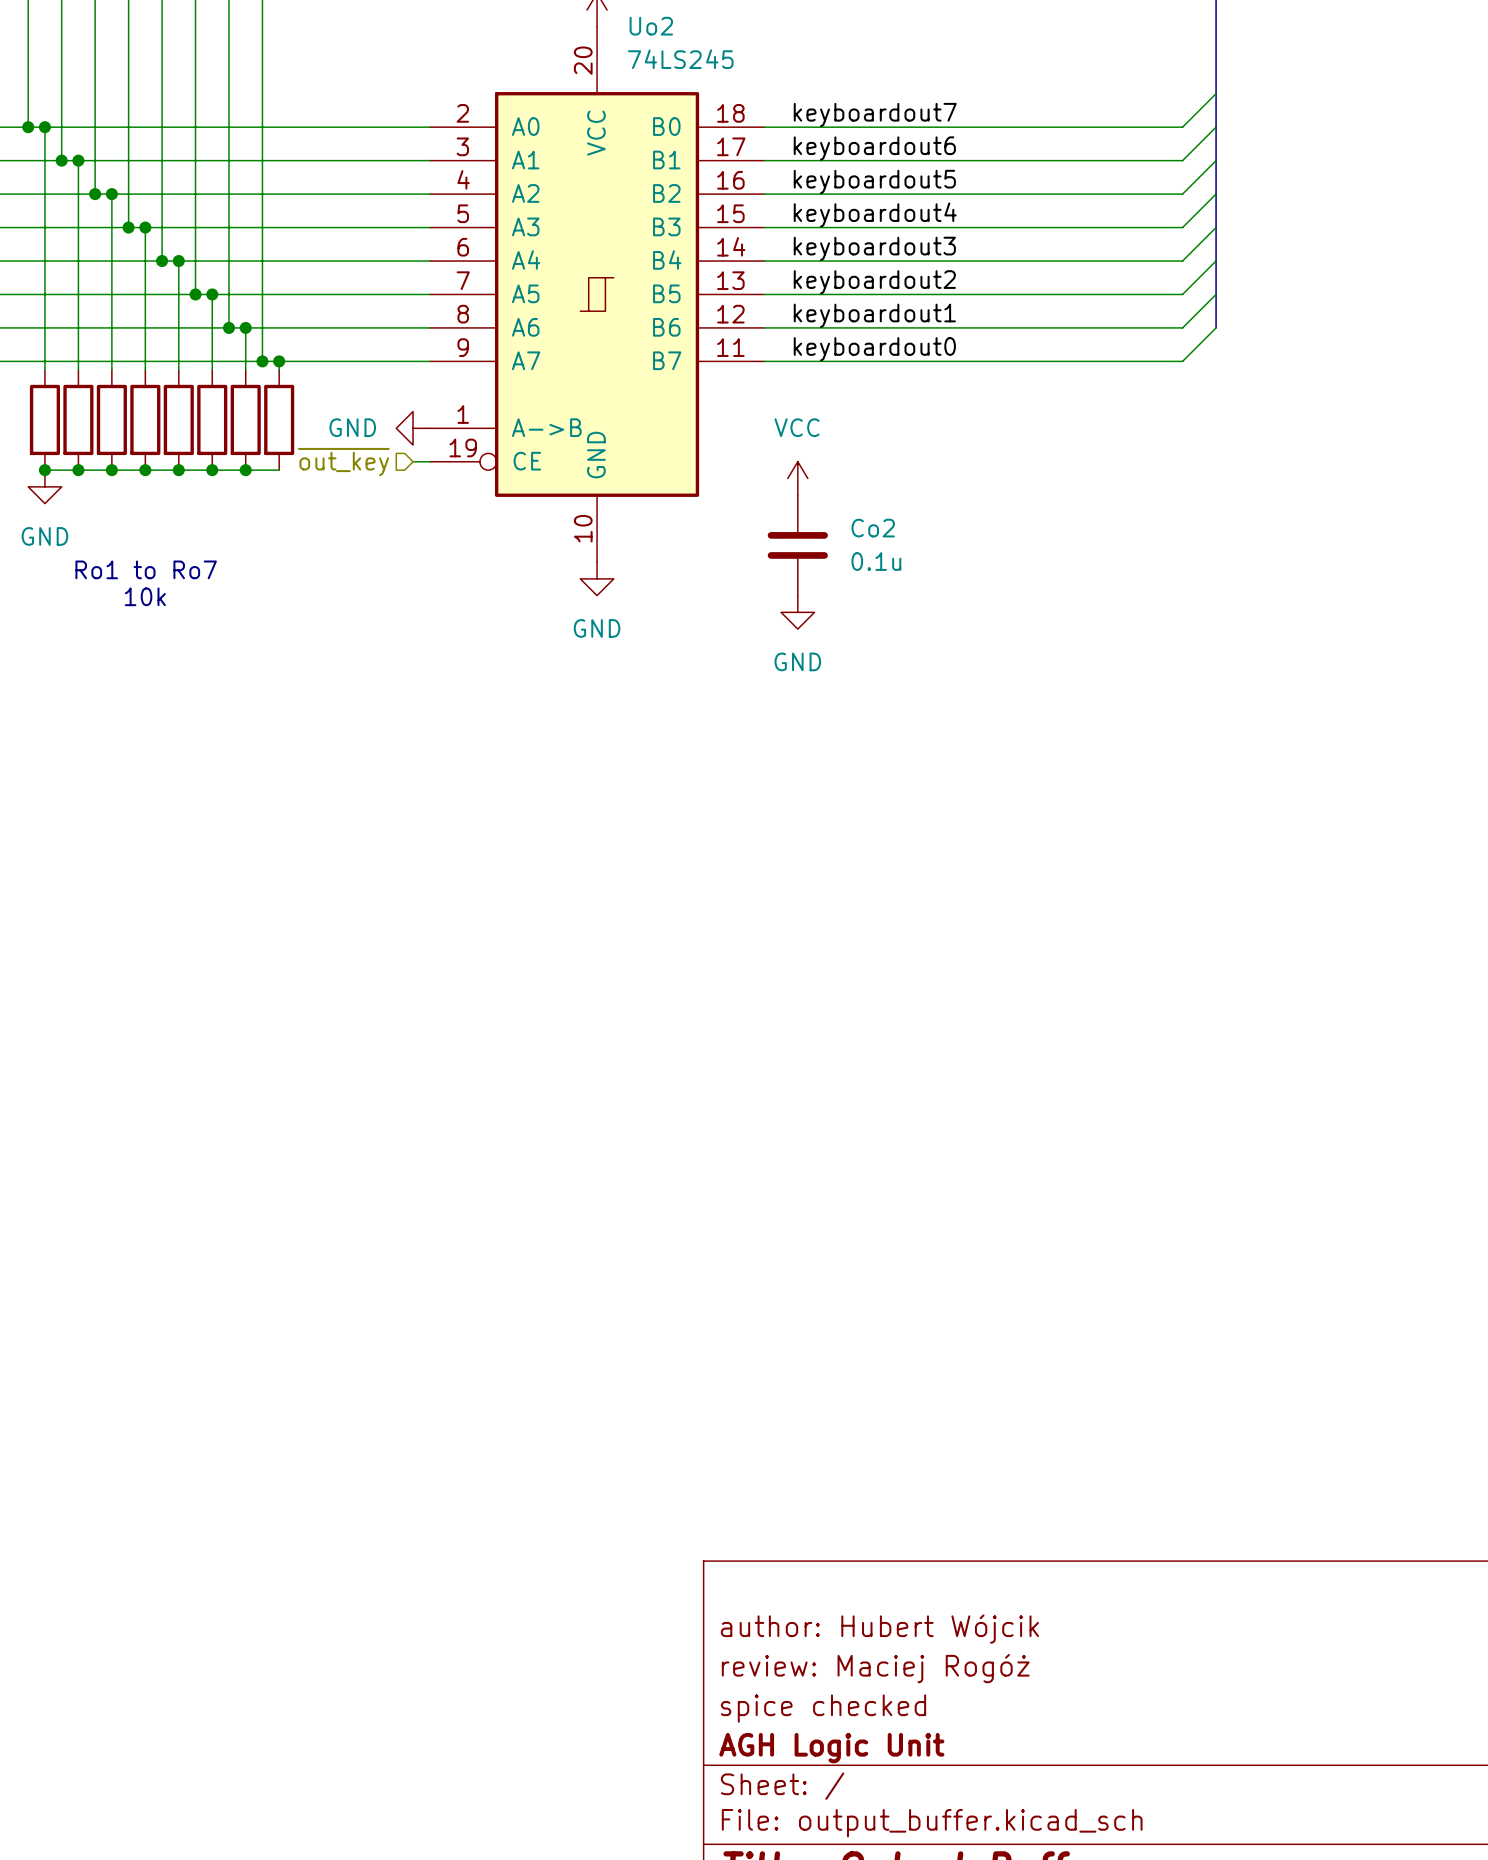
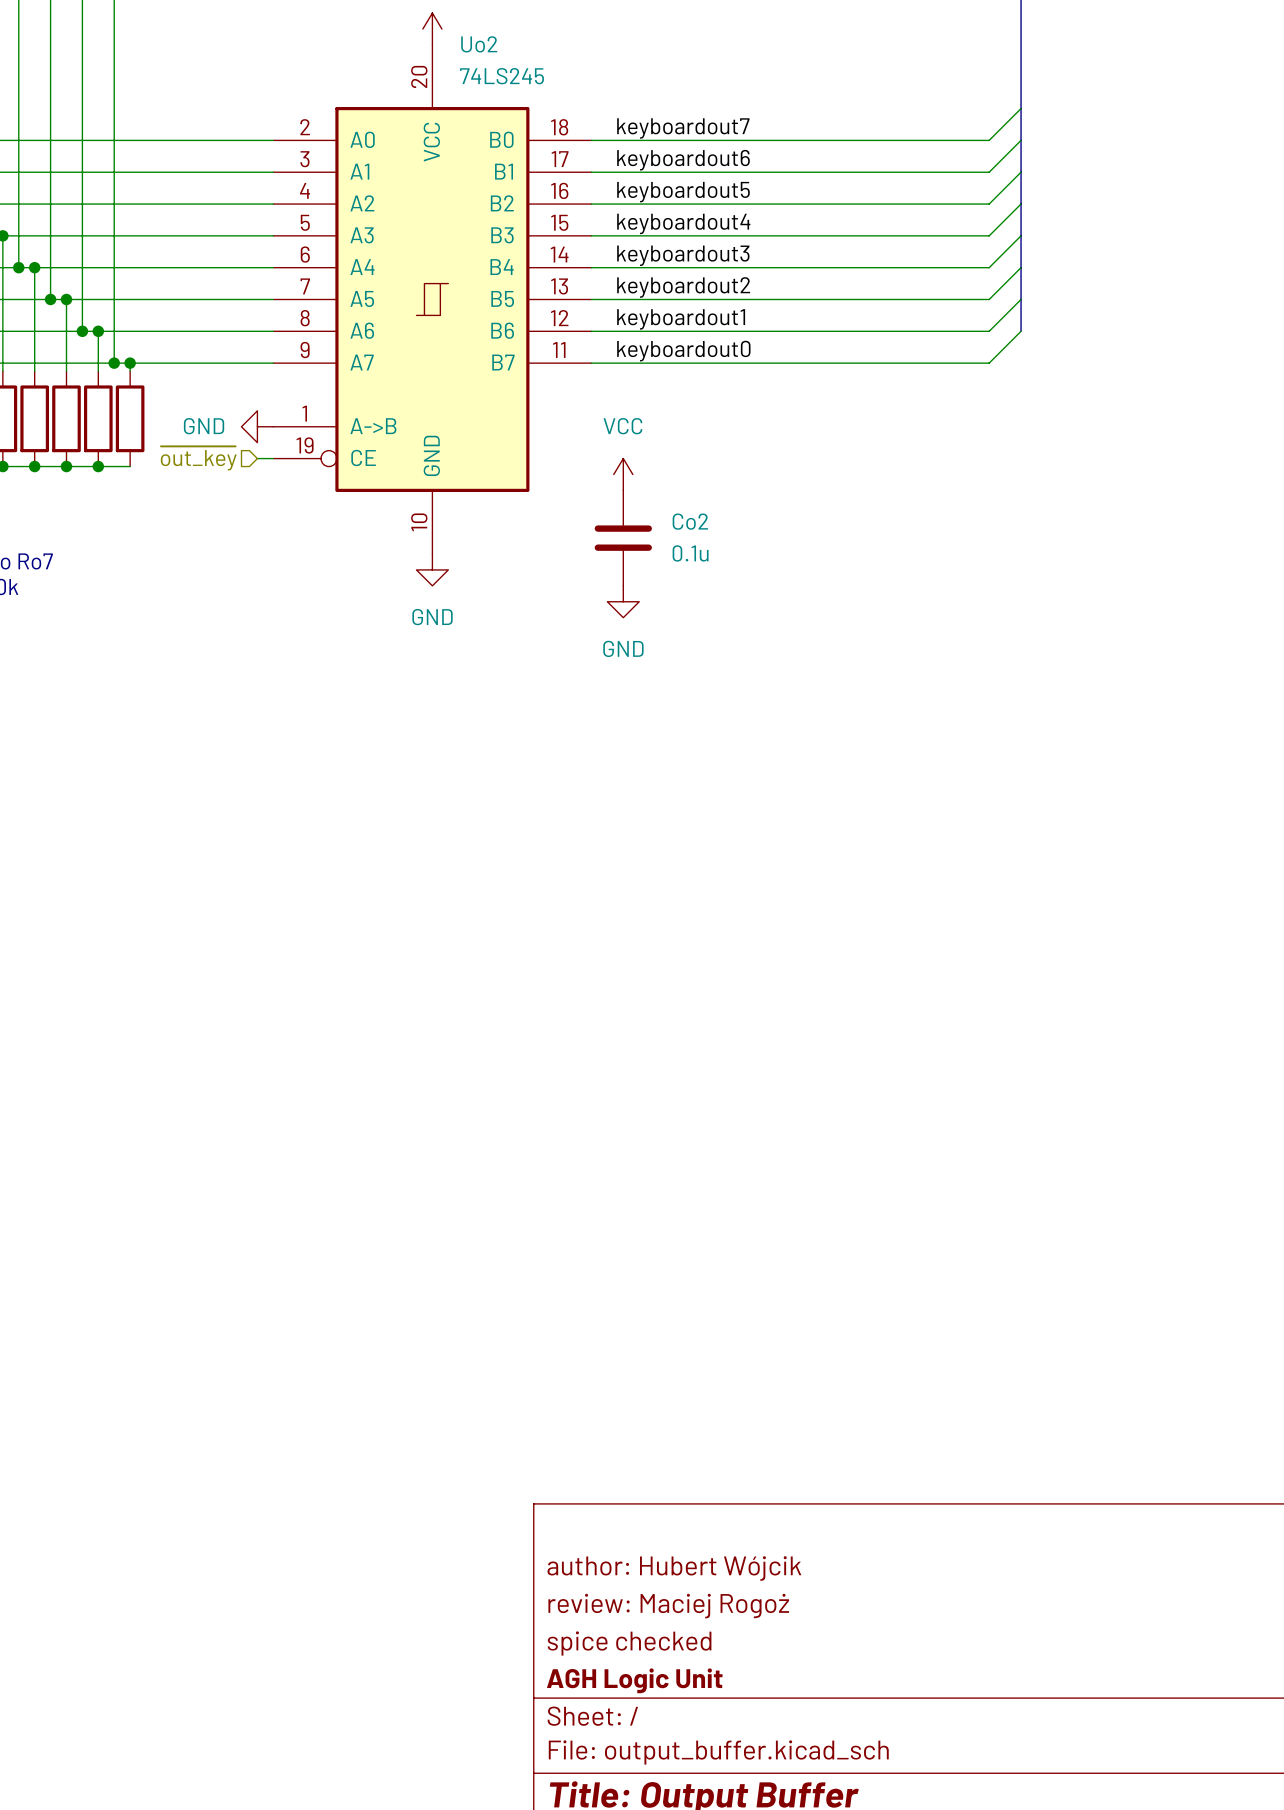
title block: review: Maciej Rogóż (875, 1668) -> review: Maciej Rogoż (668, 1606)

